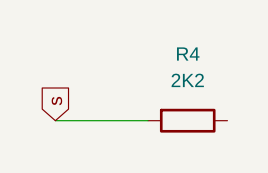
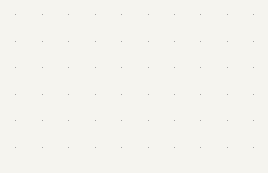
global label: s (56, 101) -> none
wire: (55, 120) (148, 120) -> none
R4: 2K2 (187, 120) -> none

